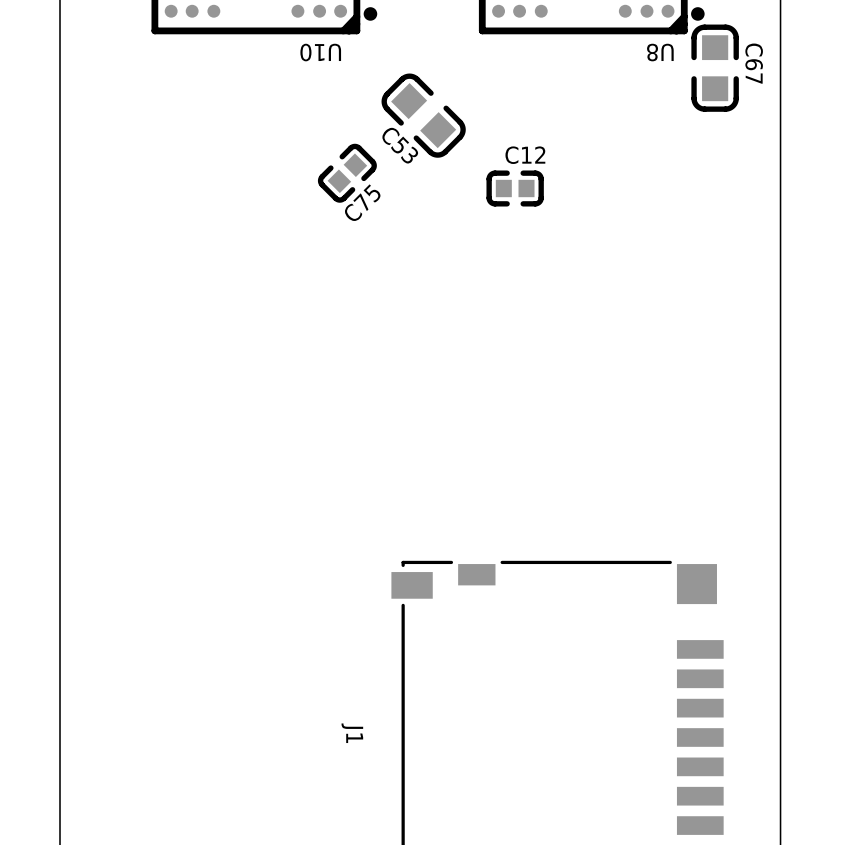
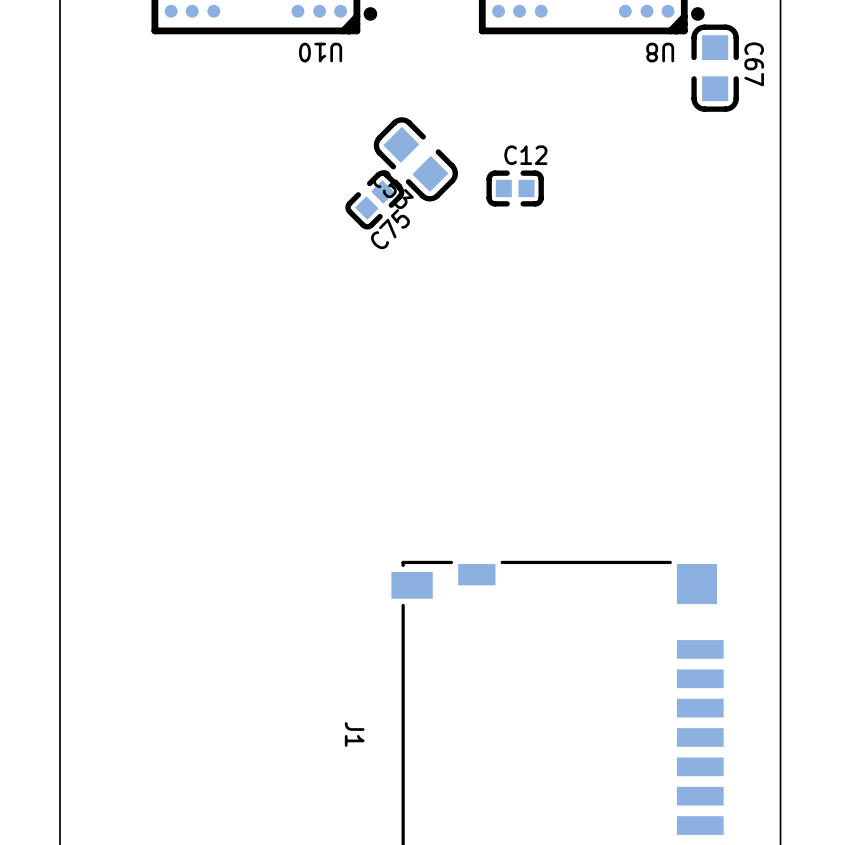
C53 position: (423, 115) -> (415, 159)
C75 position: (347, 173) -> (374, 200)

